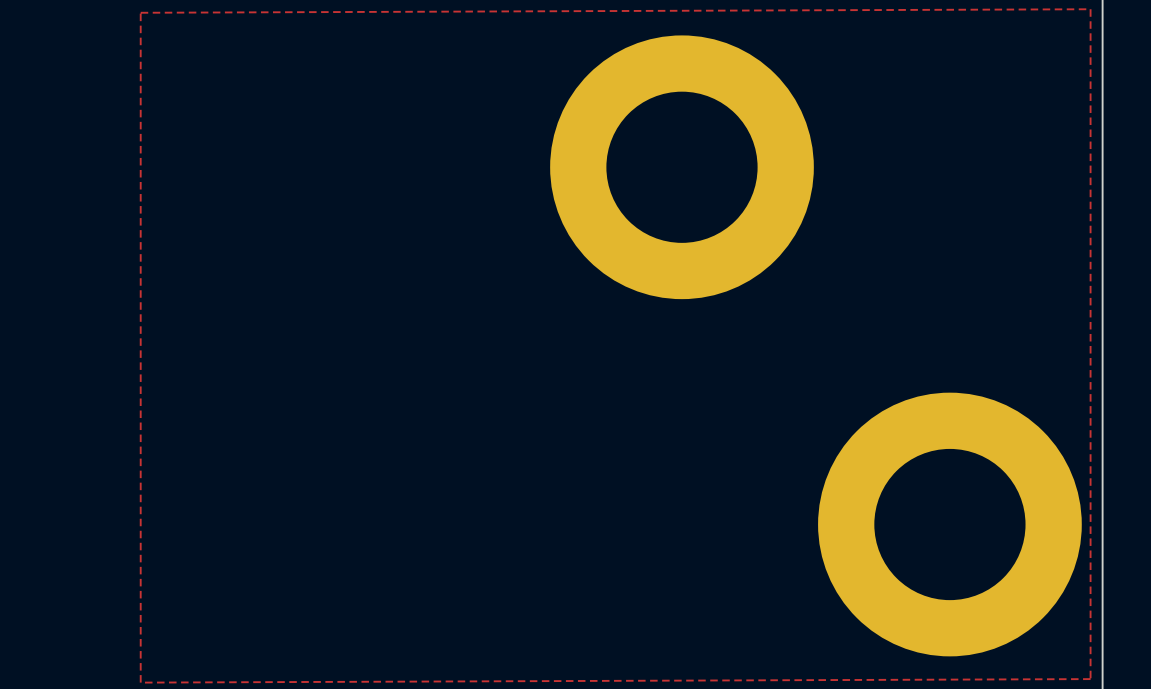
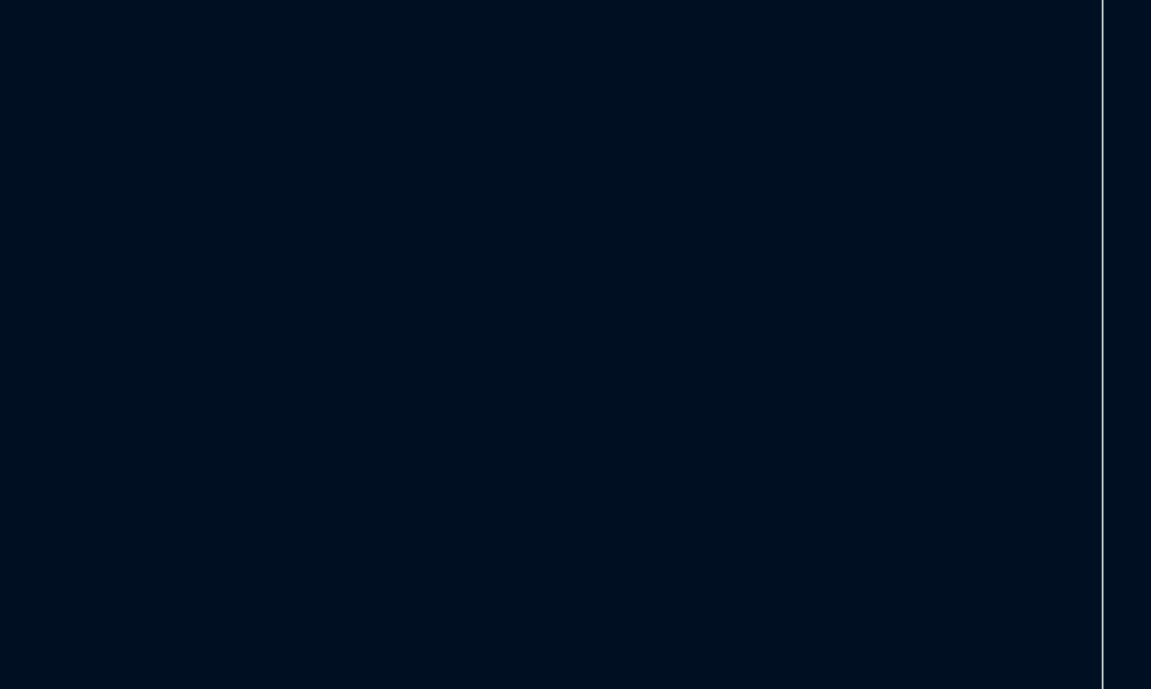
zone outline: (1090, 9) (140, 12) (140, 682) (1090, 679) (1090, 9) -> none
part: (681, 167) -> none
part: (949, 524) -> none

